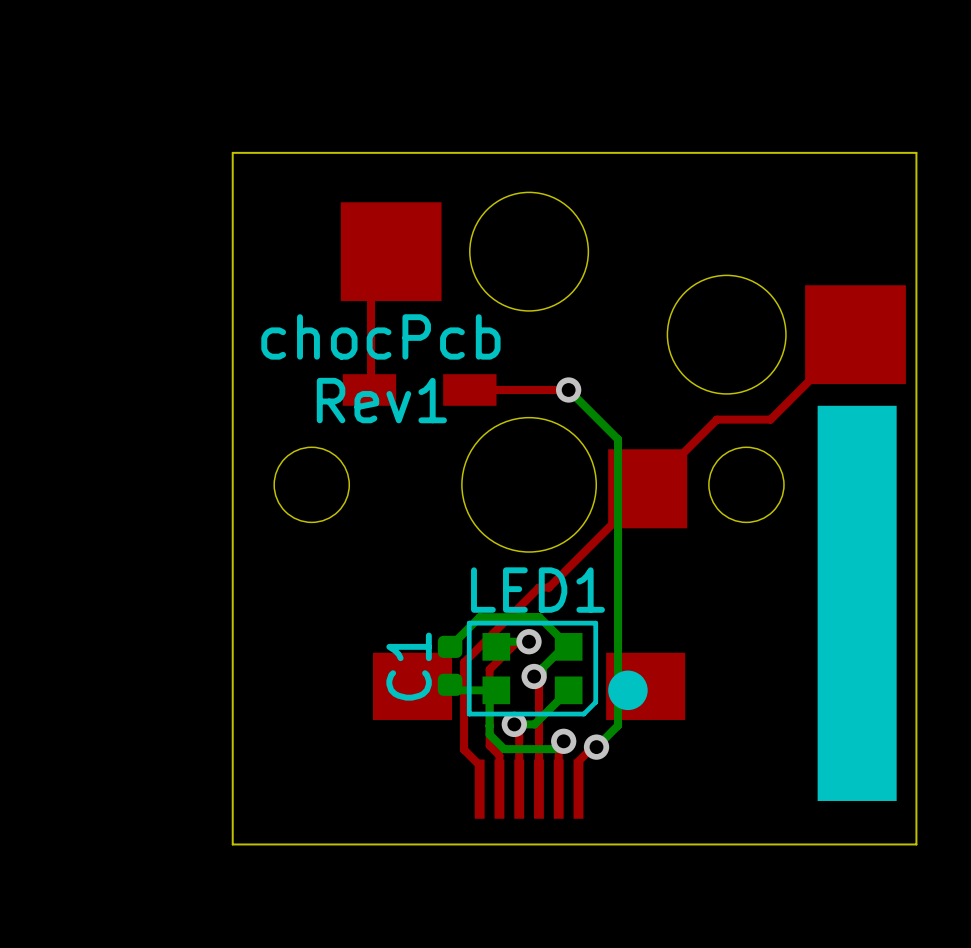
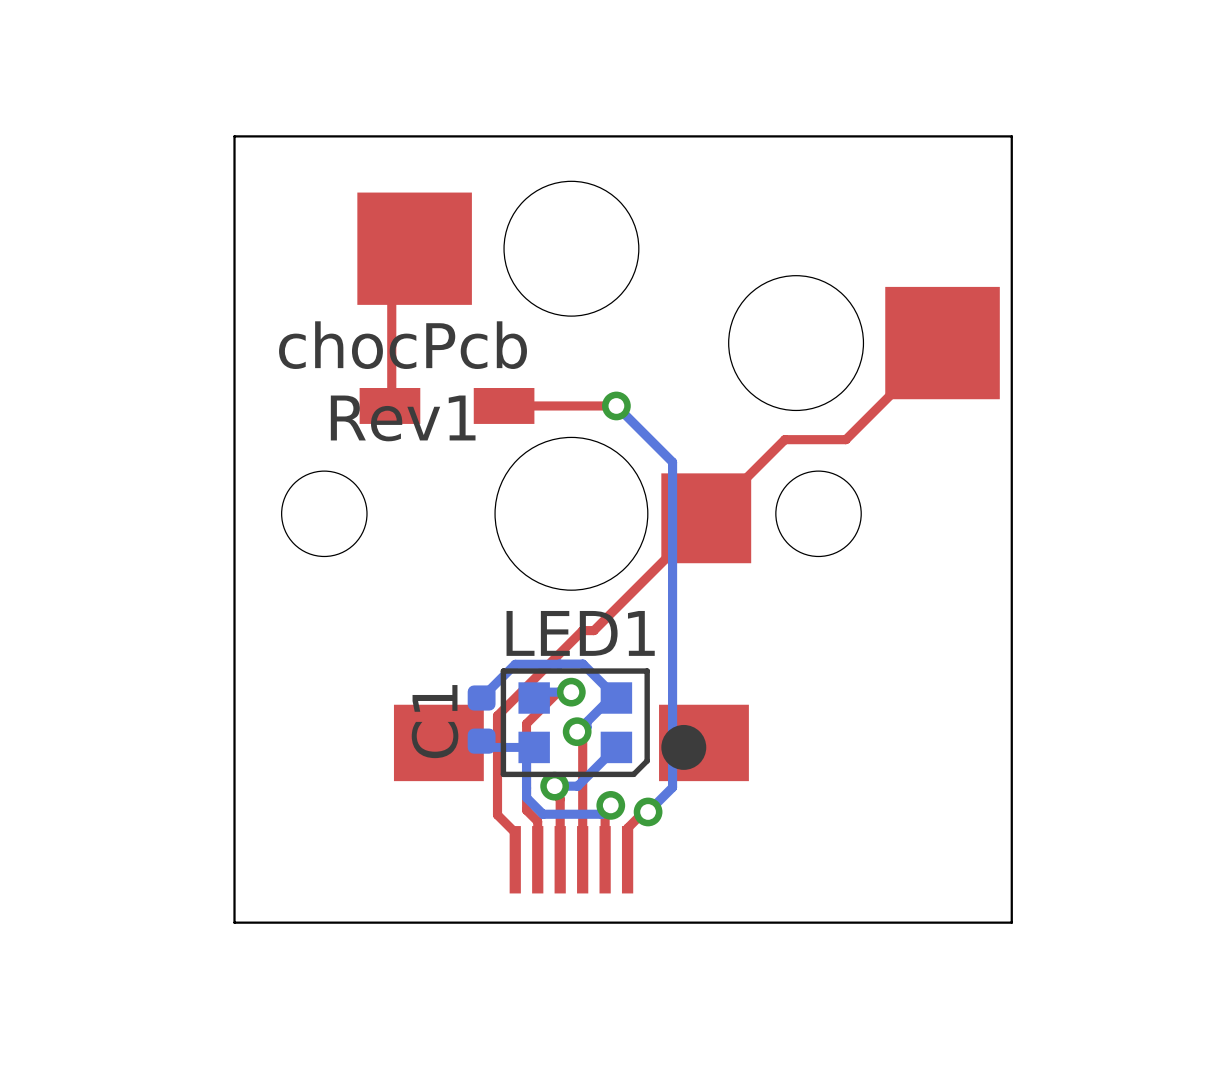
drawing: [817, 405, 897, 801] -> none

